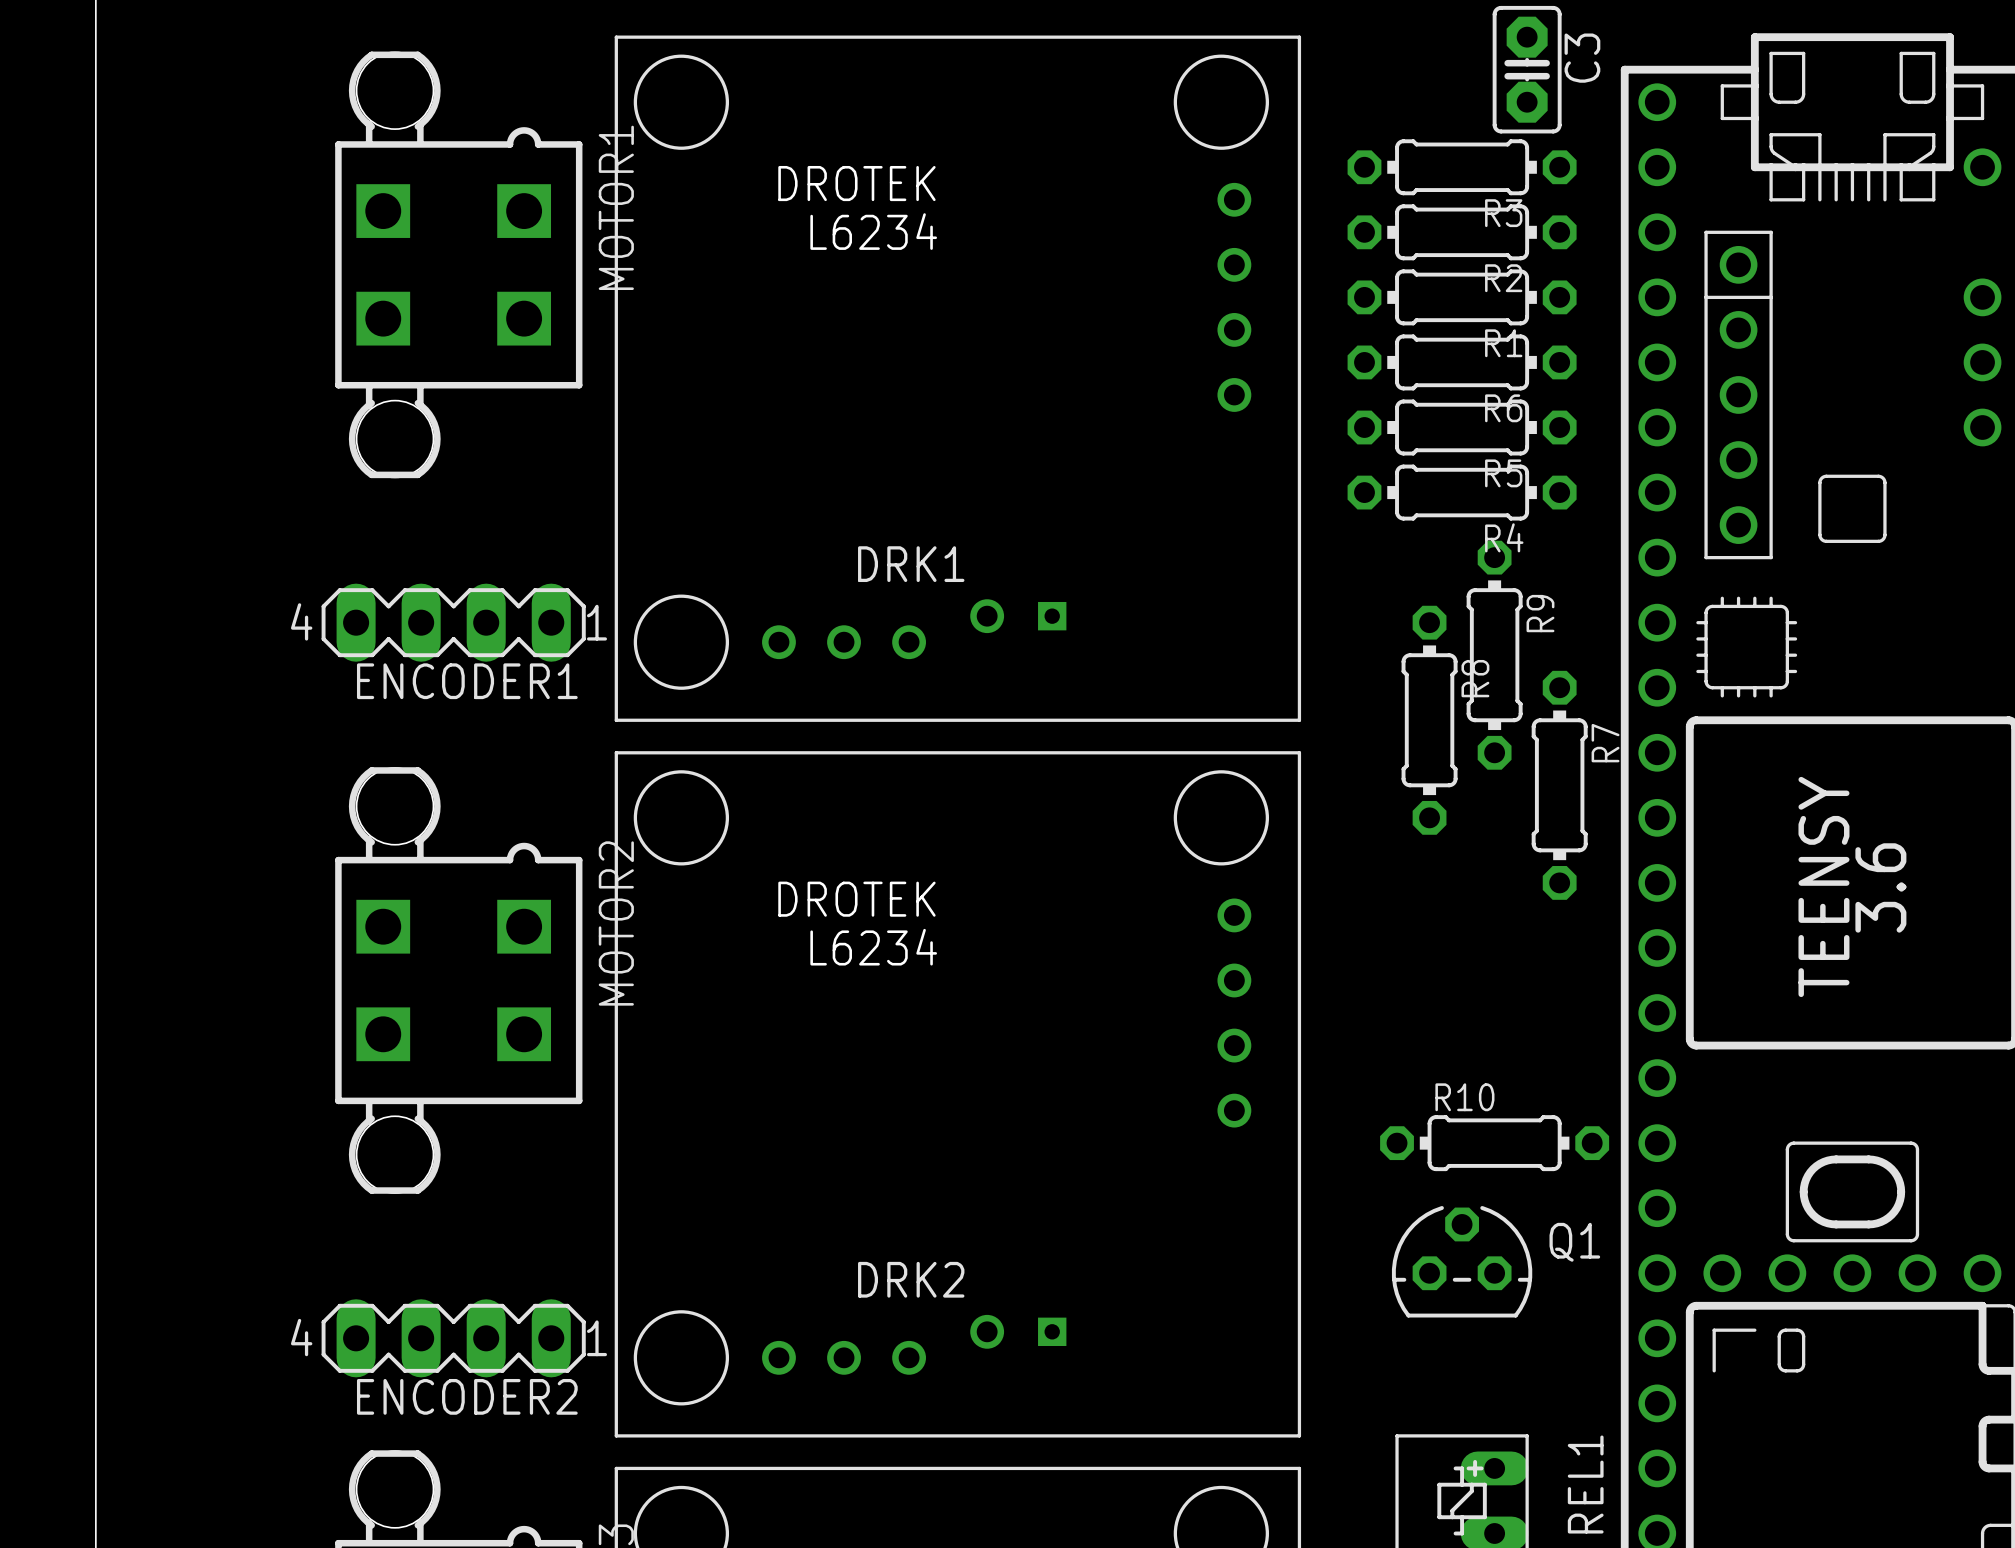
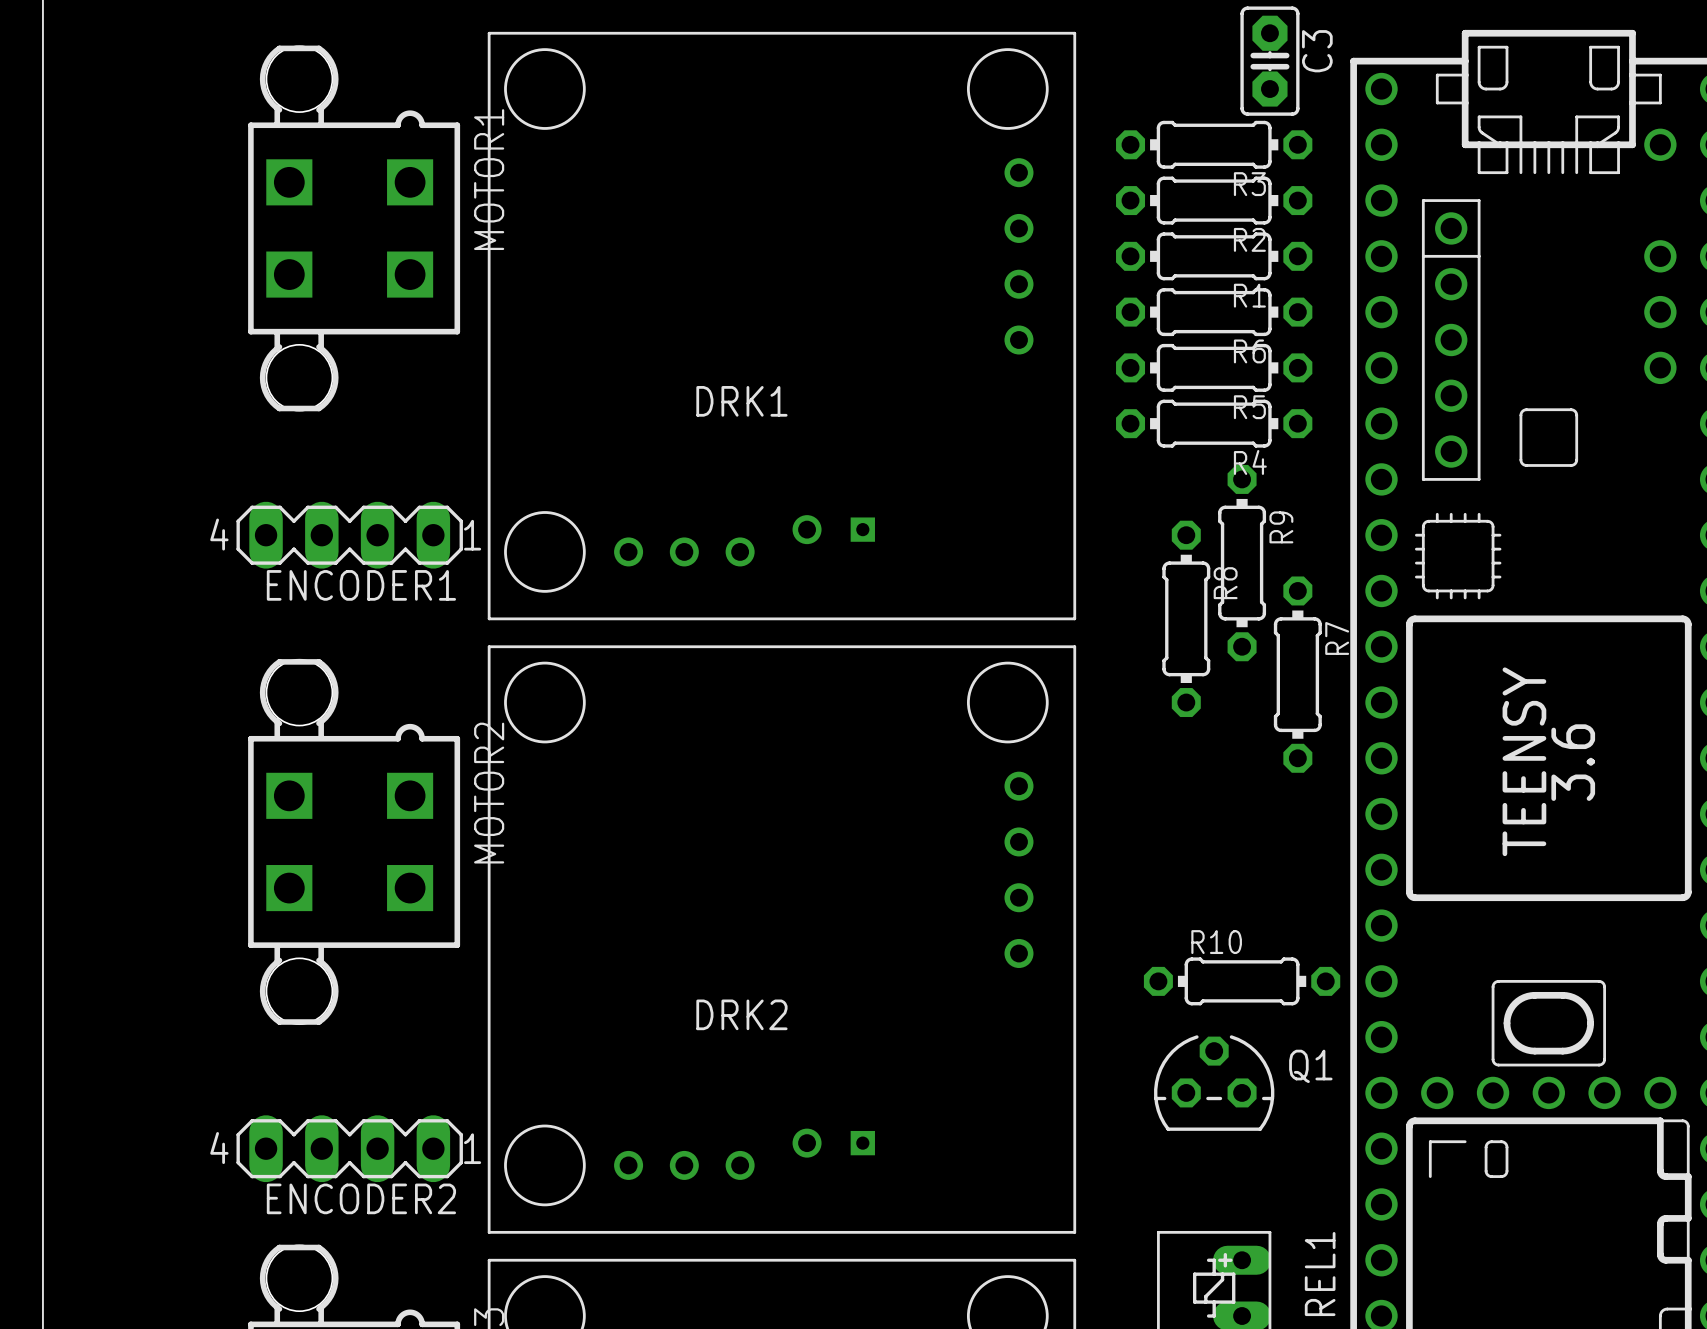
DRK1 text: DROTEK (856, 183) -> none
DRK1 text: L6234 (873, 231) -> none
DRK1 name position: DRK1 (911, 564) -> DRK1 (741, 401)
DRK2 text: DROTEK (856, 899) -> none
DRK2 text: L6234 (873, 947) -> none
DRK2 name position: DRK2 (911, 1279) -> DRK2 (741, 1014)

